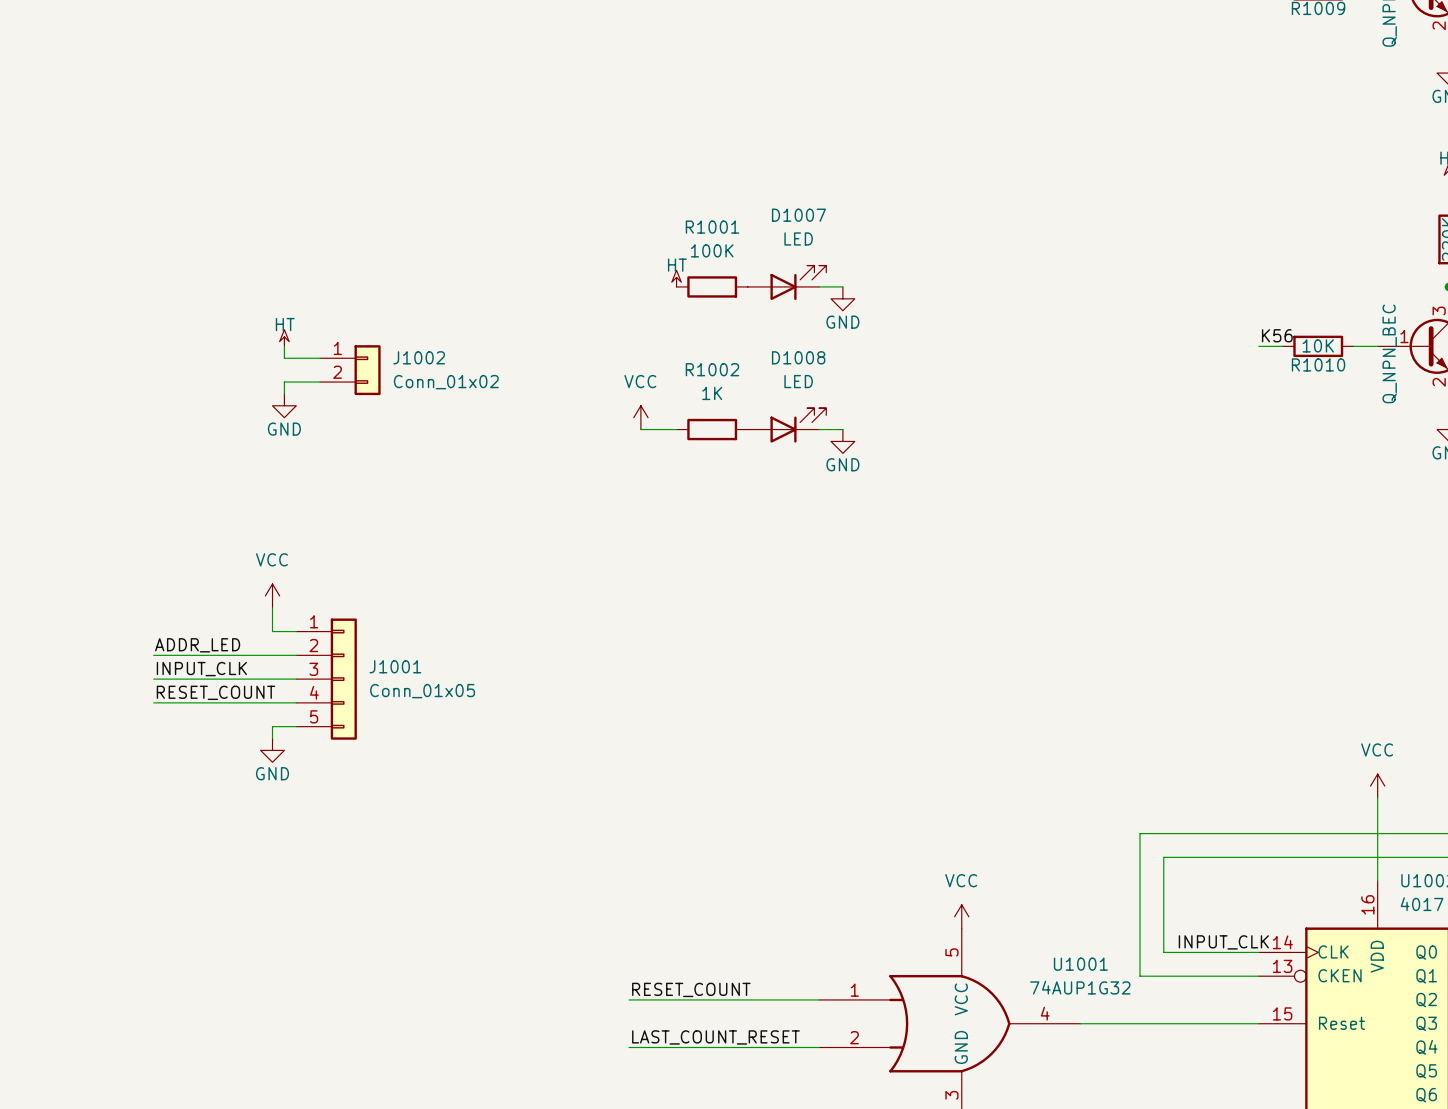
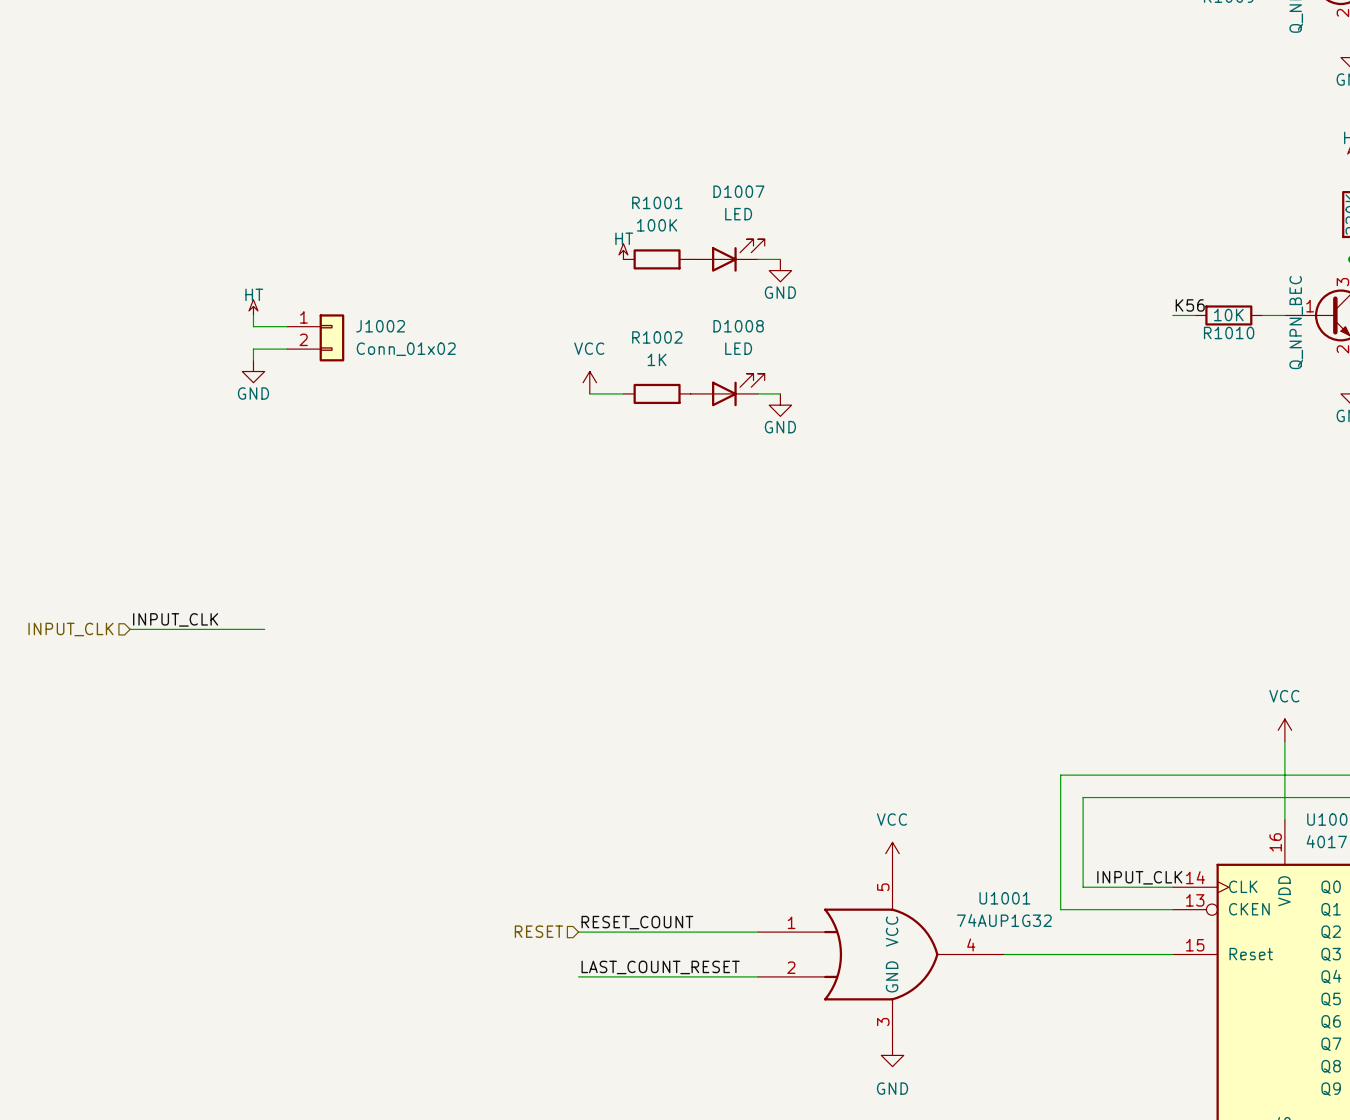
power symbol: VCC (272, 595) -> none
wire: (272, 607) (272, 631) (296, 631) -> none
label: ADDR_LED (197, 645) -> none
wire: (153, 655) (296, 655) -> none
hierarchical label: none -> INPUT_CLK (70, 629)
J1001: Conn_01x05 (326, 679) -> none
label: RESET_COUNT (216, 692) -> none
wire: (153, 702) (296, 702) -> none
wire: (296, 726) (272, 726) (272, 738) -> none
power symbol: GND (272, 750) -> none
hierarchical label: none -> RESET (538, 931)

